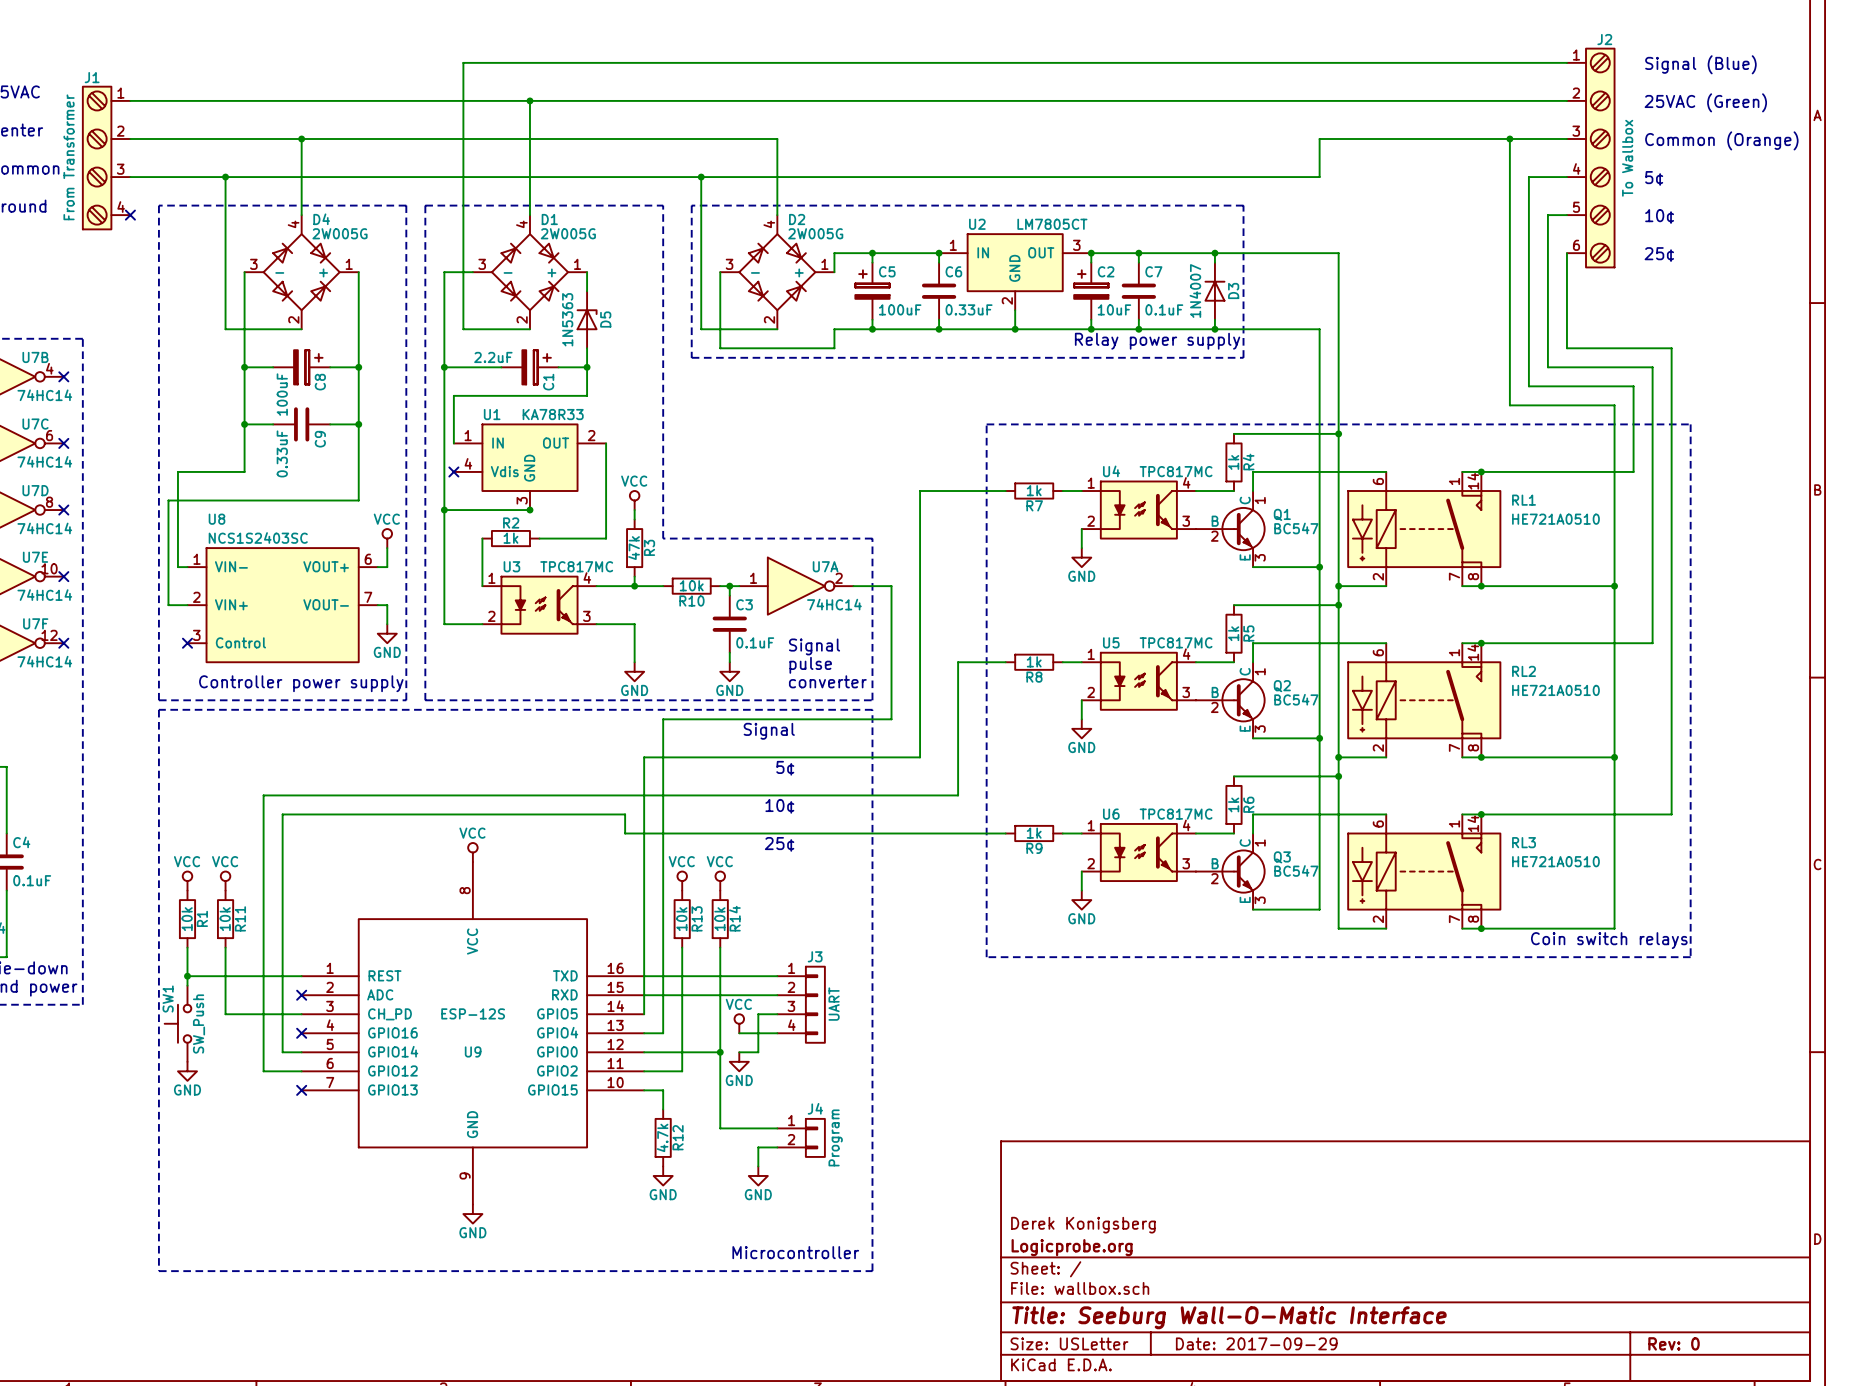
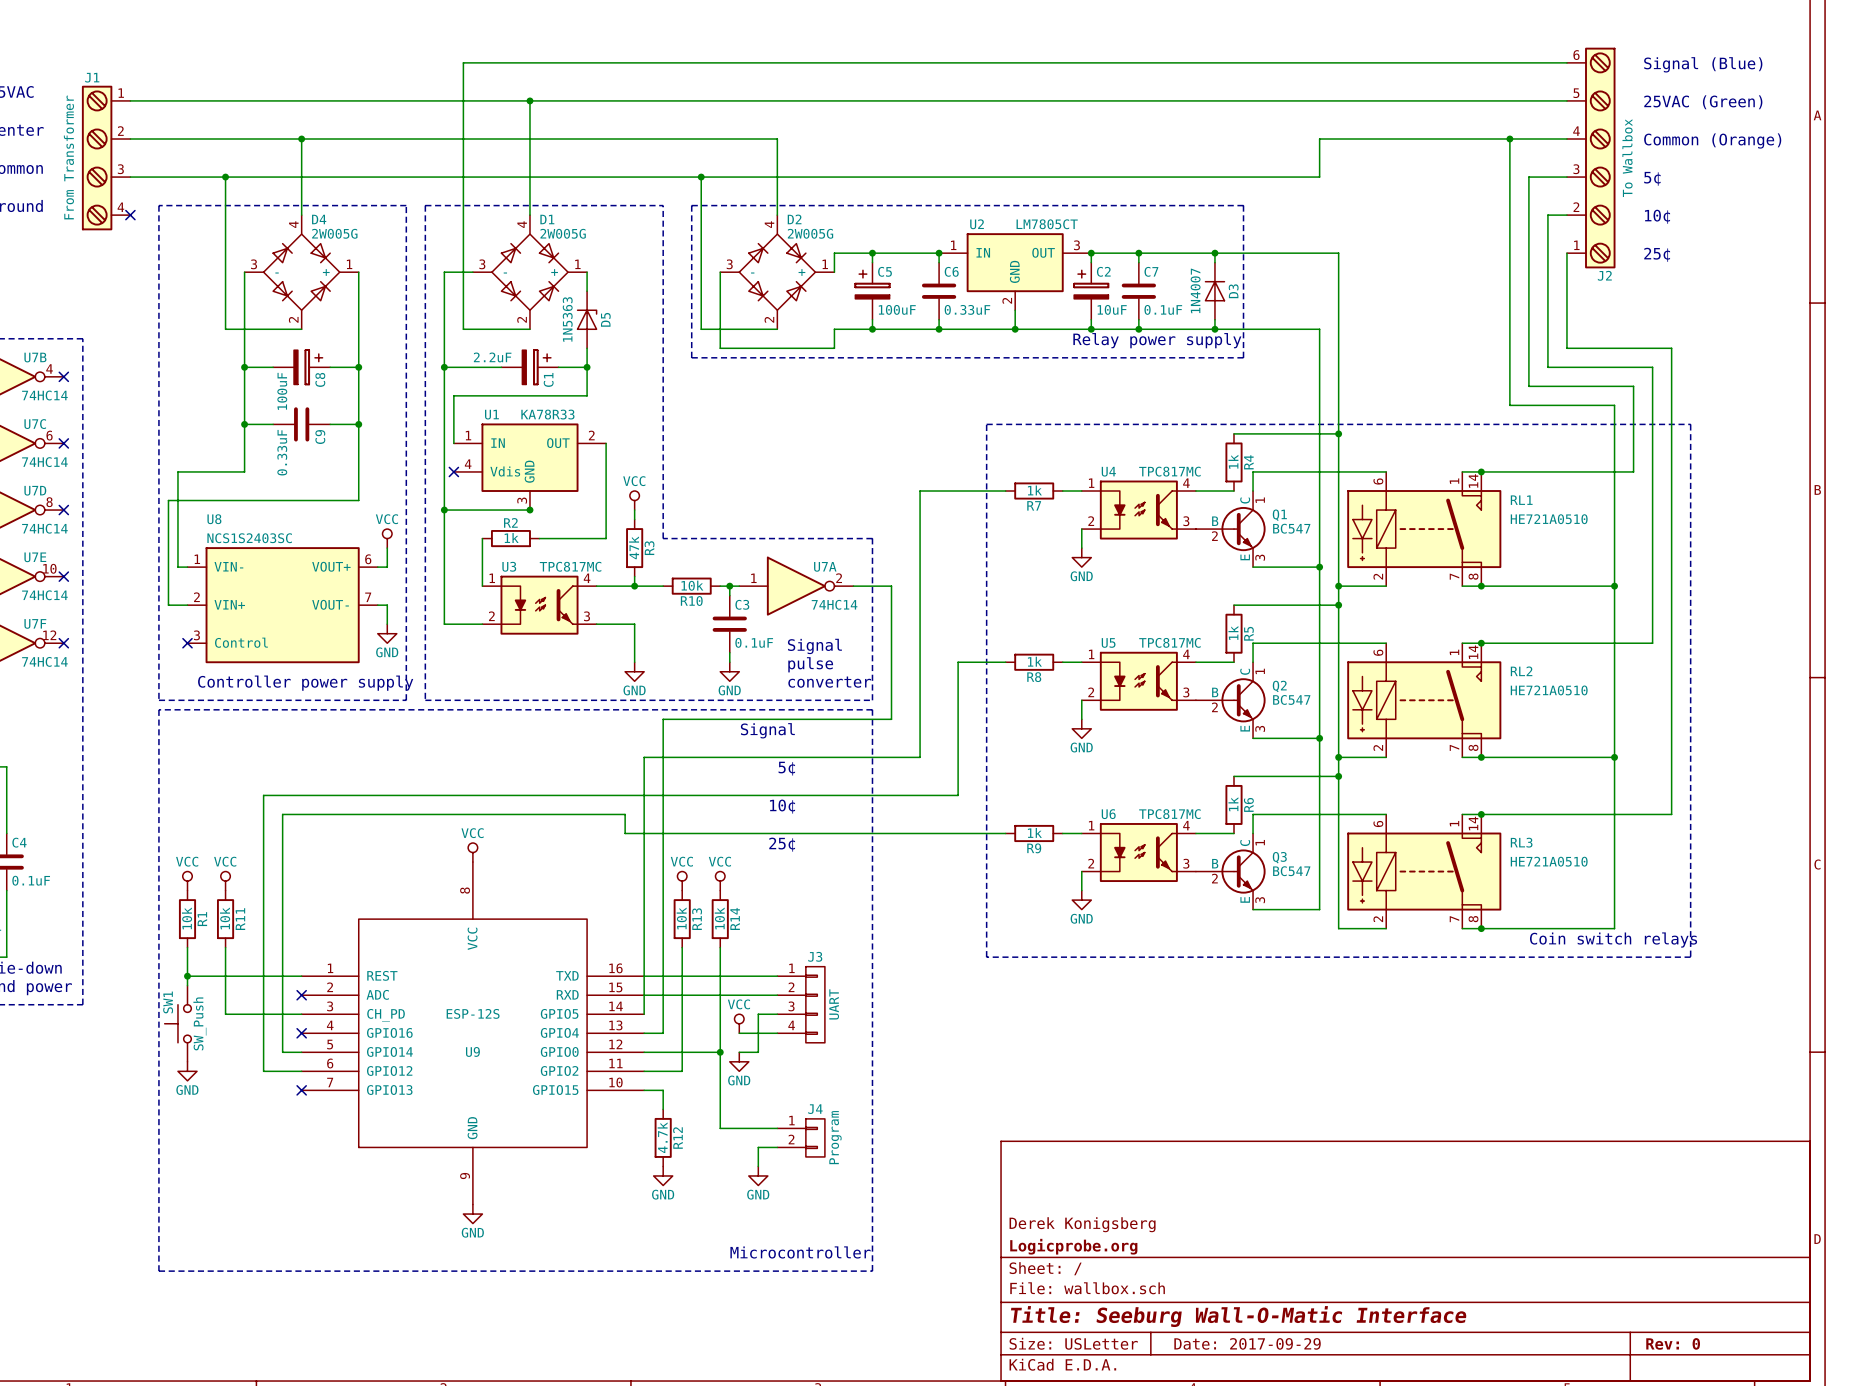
J2 flip: as is (1600, 158) -> up-down (1600, 158)

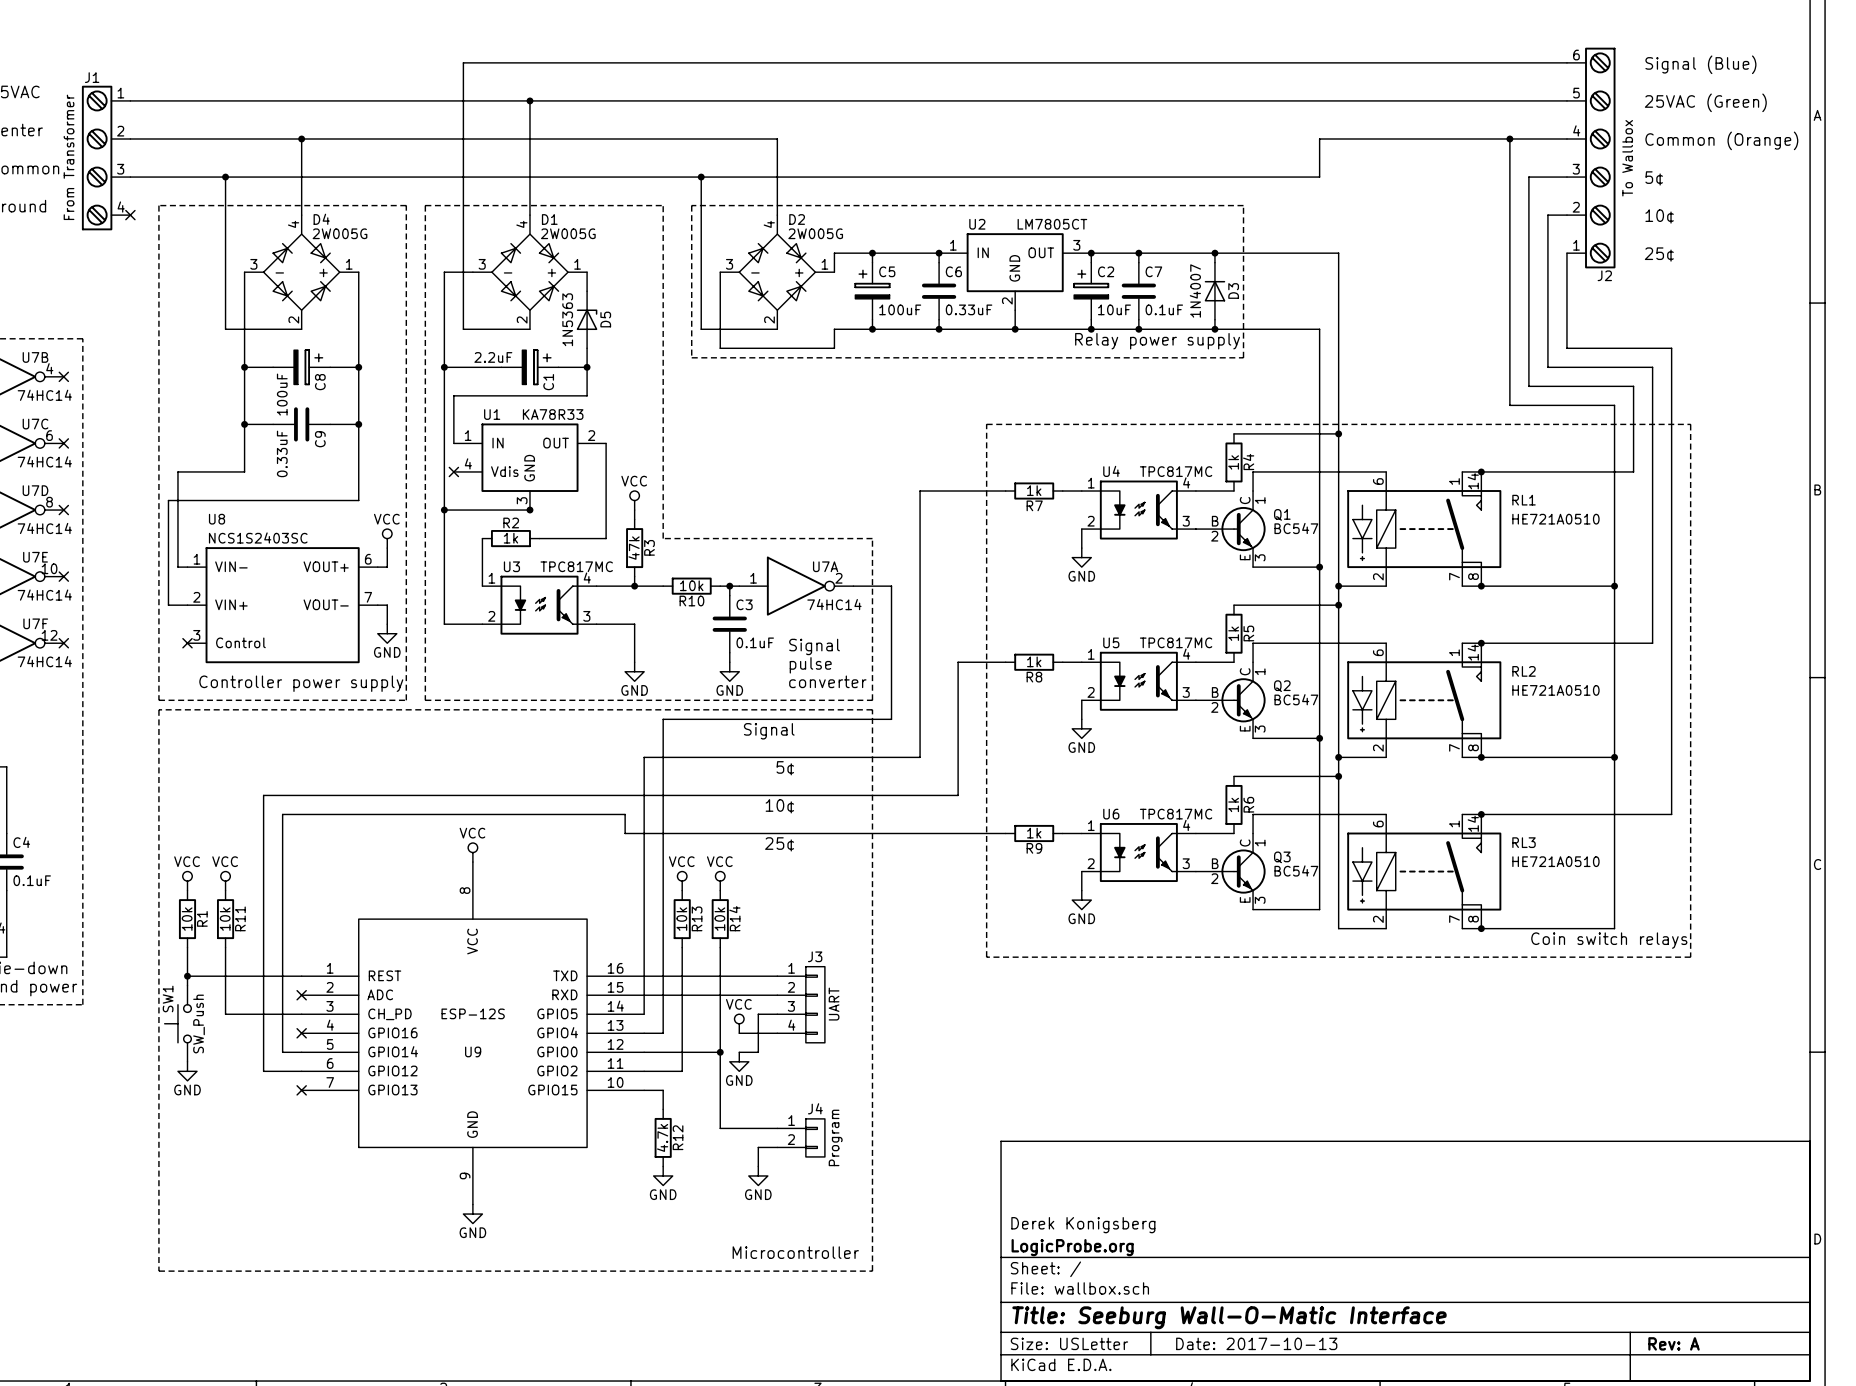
title block: Logicprobe.org (1073, 1246) -> LogicProbe.org (1072, 1247)
title block: Date: 2017-09-29 (1247, 1343) -> Date: 2017-10-13 (1256, 1343)
title block: Rev: 0 (1673, 1343) -> Rev: A (1674, 1343)

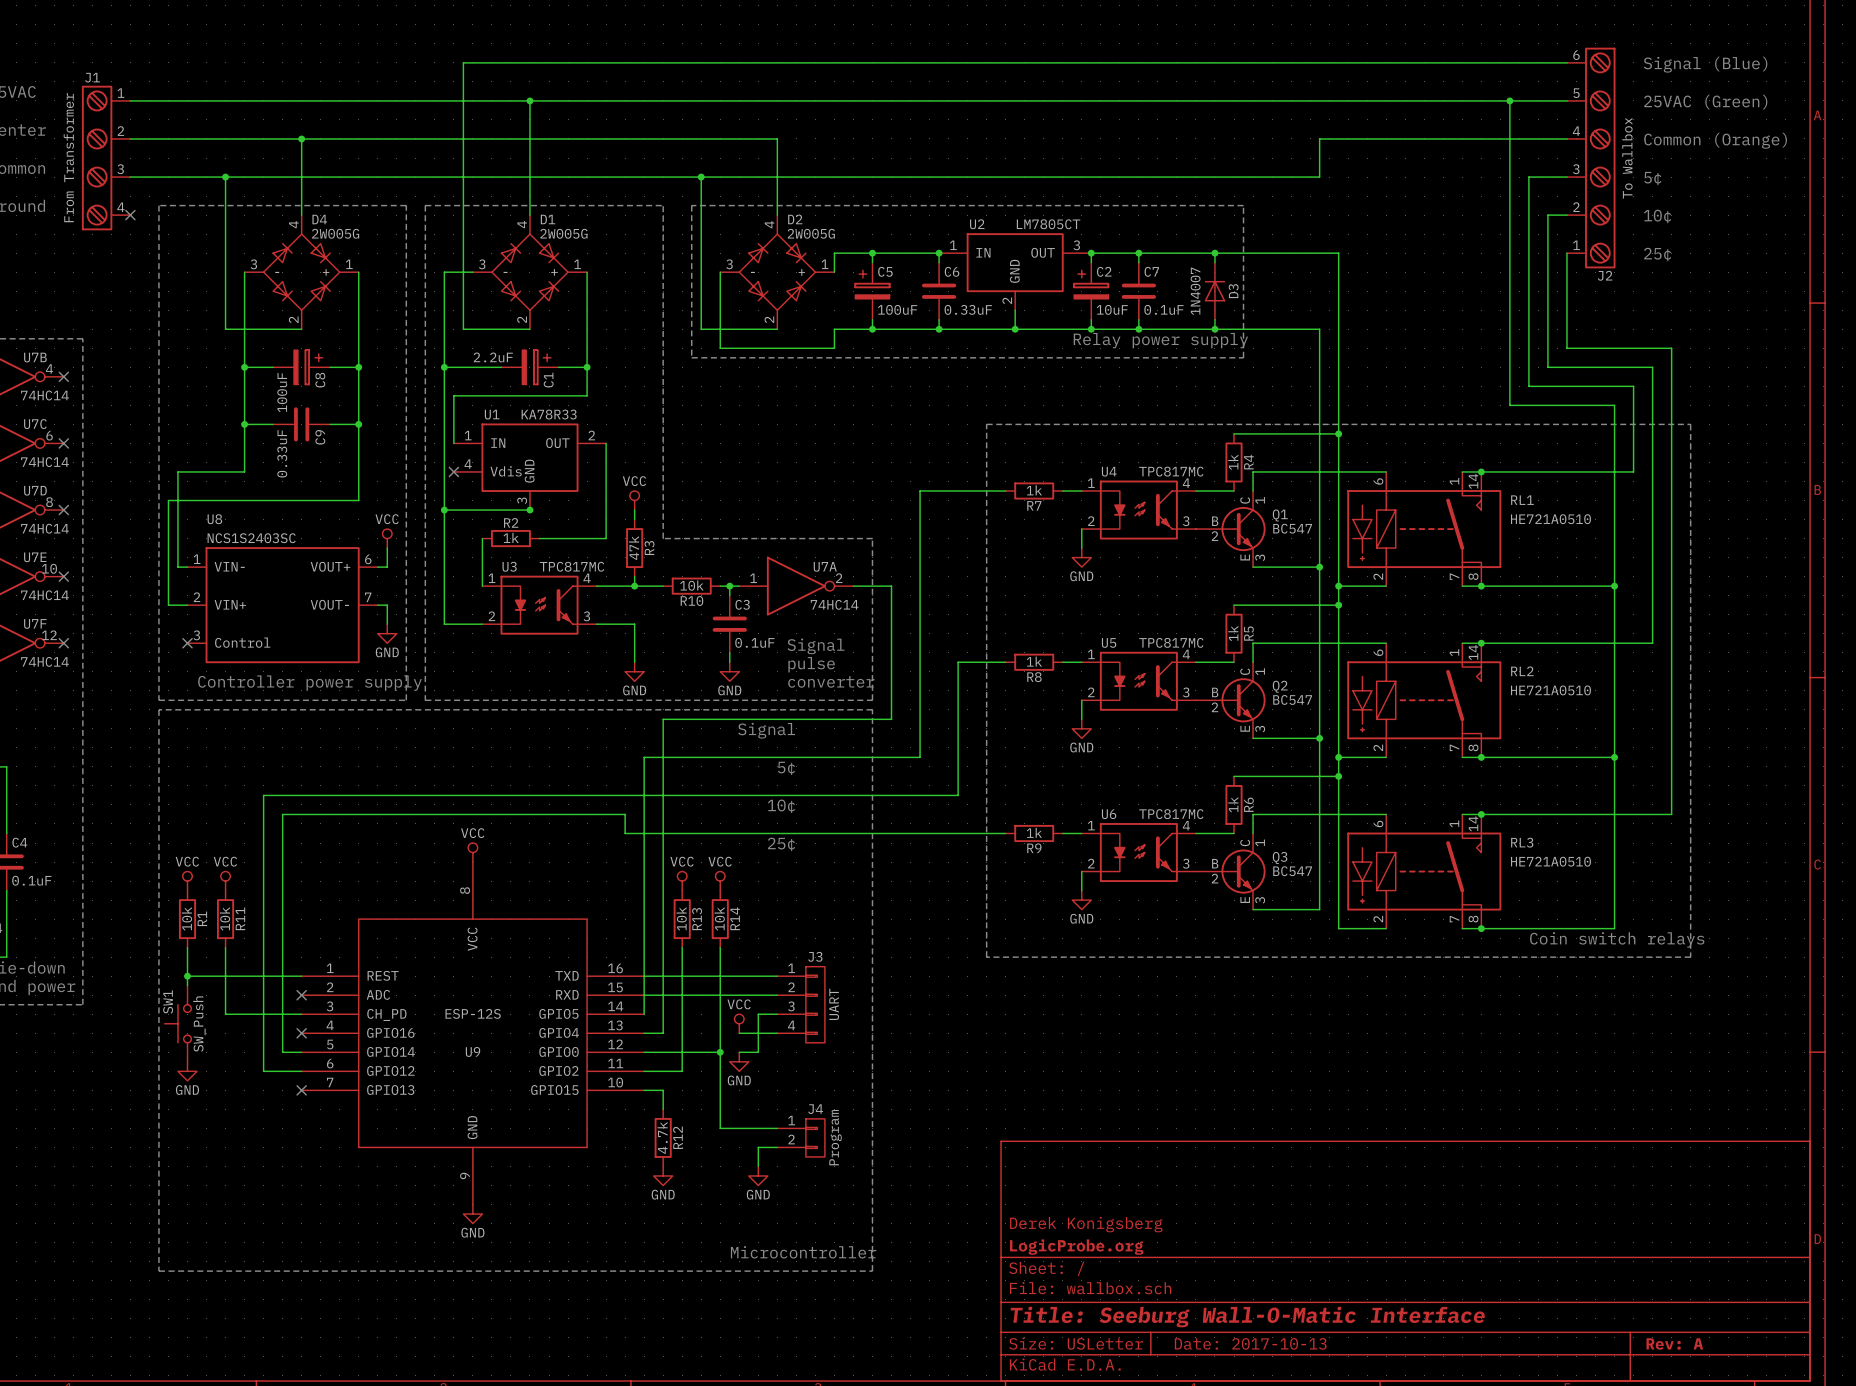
wire: none -> (1509, 100) (1509, 138)
junction position: (1509, 138) -> (1509, 100)
D5: 1N5363 (587, 319) -> none

